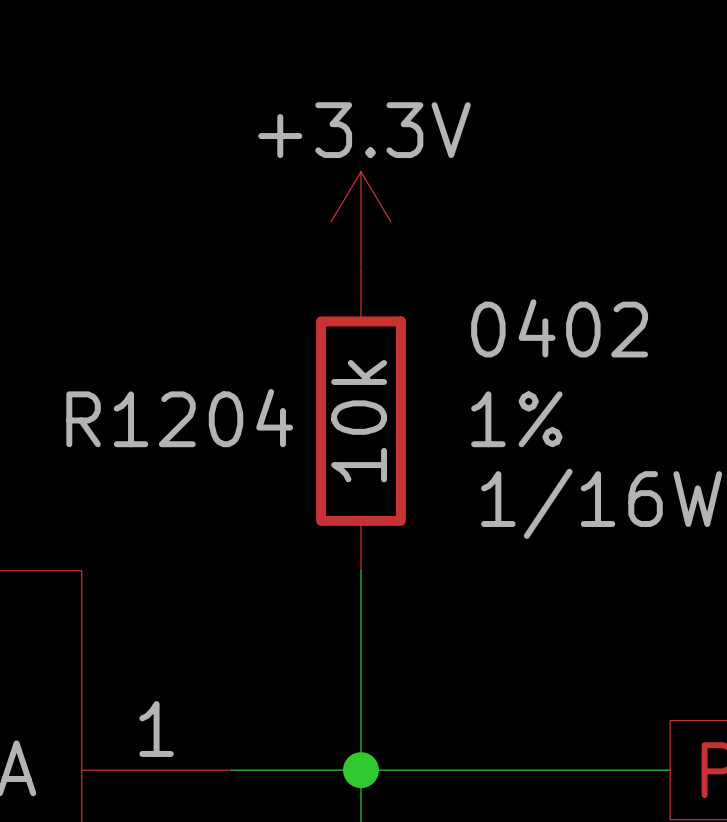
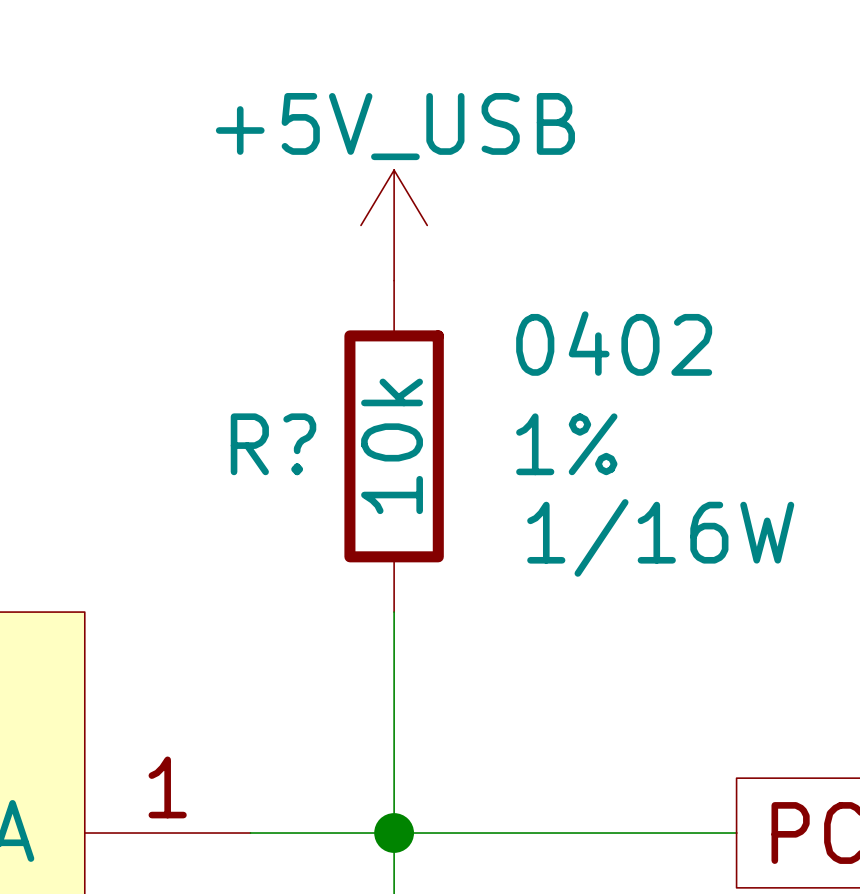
power symbol: +3.3V (360, 221) -> +5V_USB (394, 225)
R1204 name: R1204 (179, 418) -> R? (273, 444)

